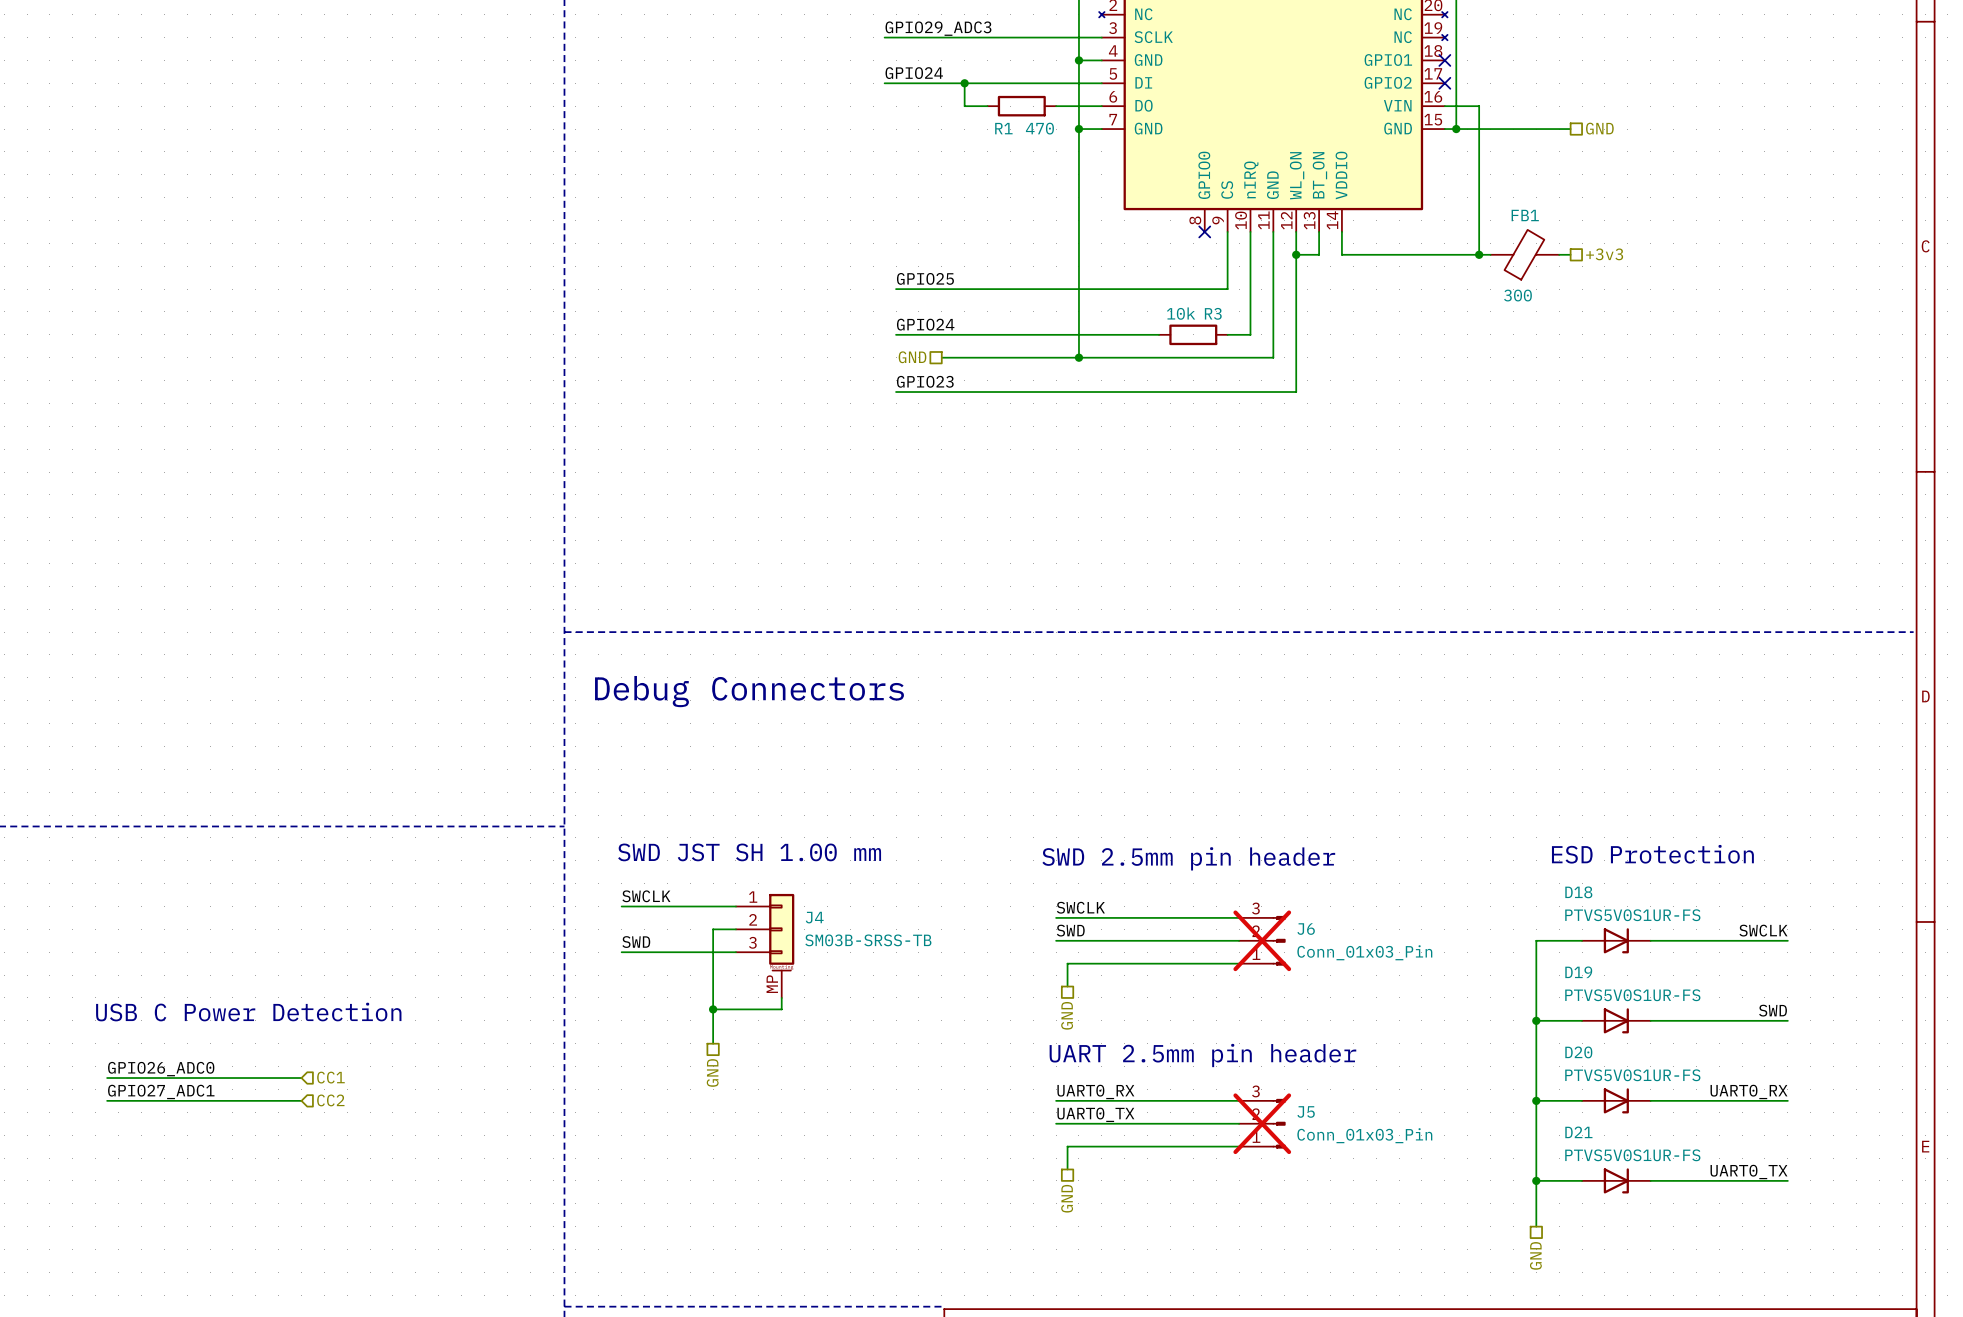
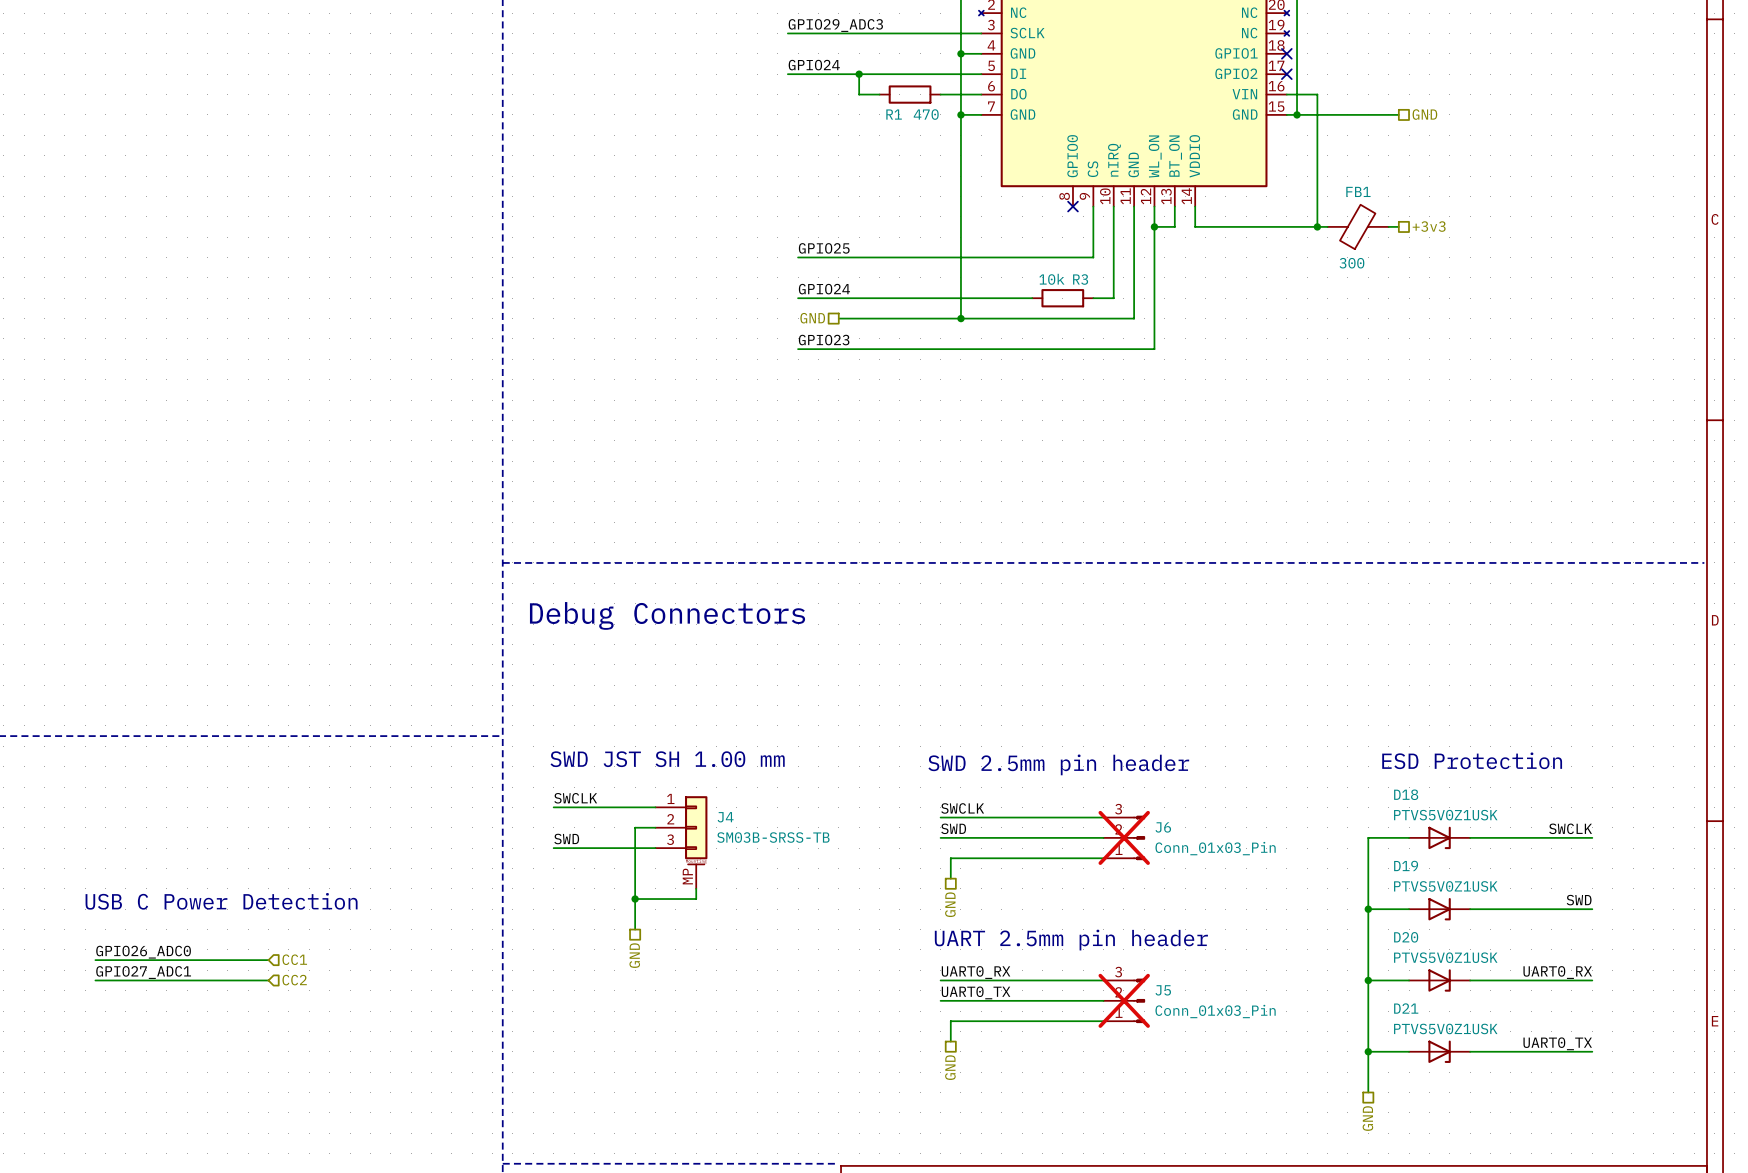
D18 value: PTVS5V0S1UR-FS (1632, 915) -> PTVS5V0Z1USK (1445, 815)
D19 value: PTVS5V0S1UR-FS (1632, 995) -> PTVS5V0Z1USK (1445, 886)
D20 value: PTVS5V0S1UR-FS (1632, 1075) -> PTVS5V0Z1USK (1445, 957)
D21 value: PTVS5V0S1UR-FS (1632, 1155) -> PTVS5V0Z1USK (1445, 1028)

